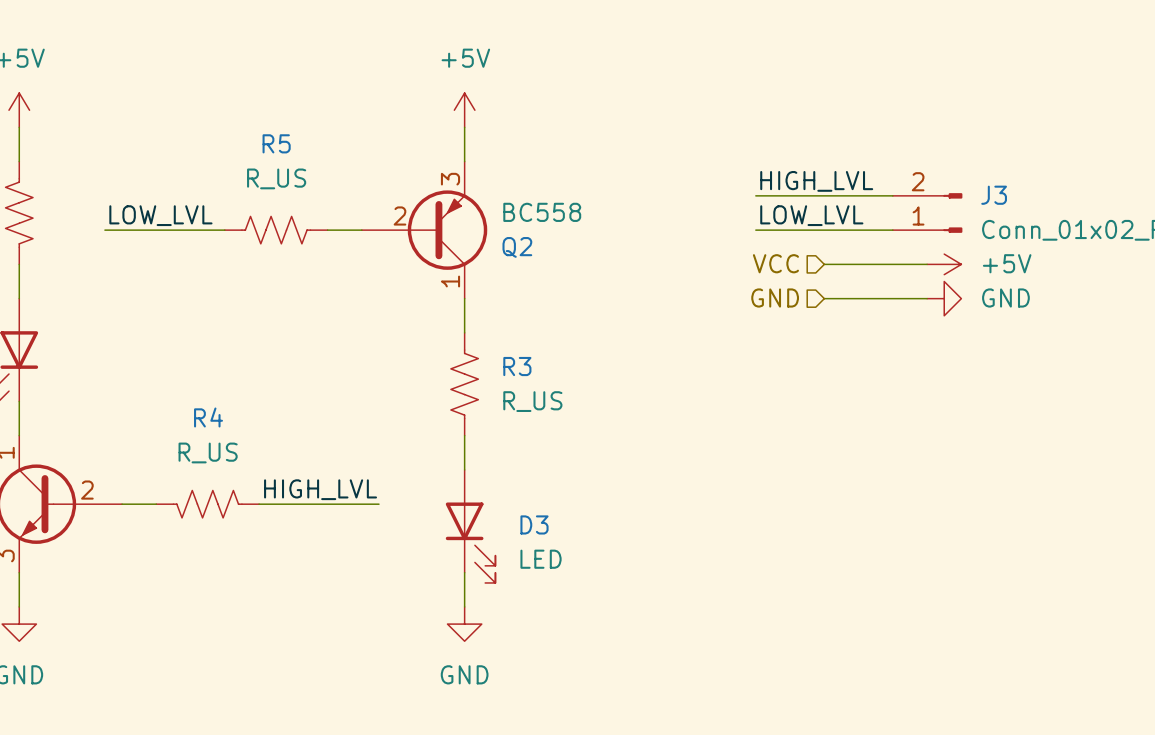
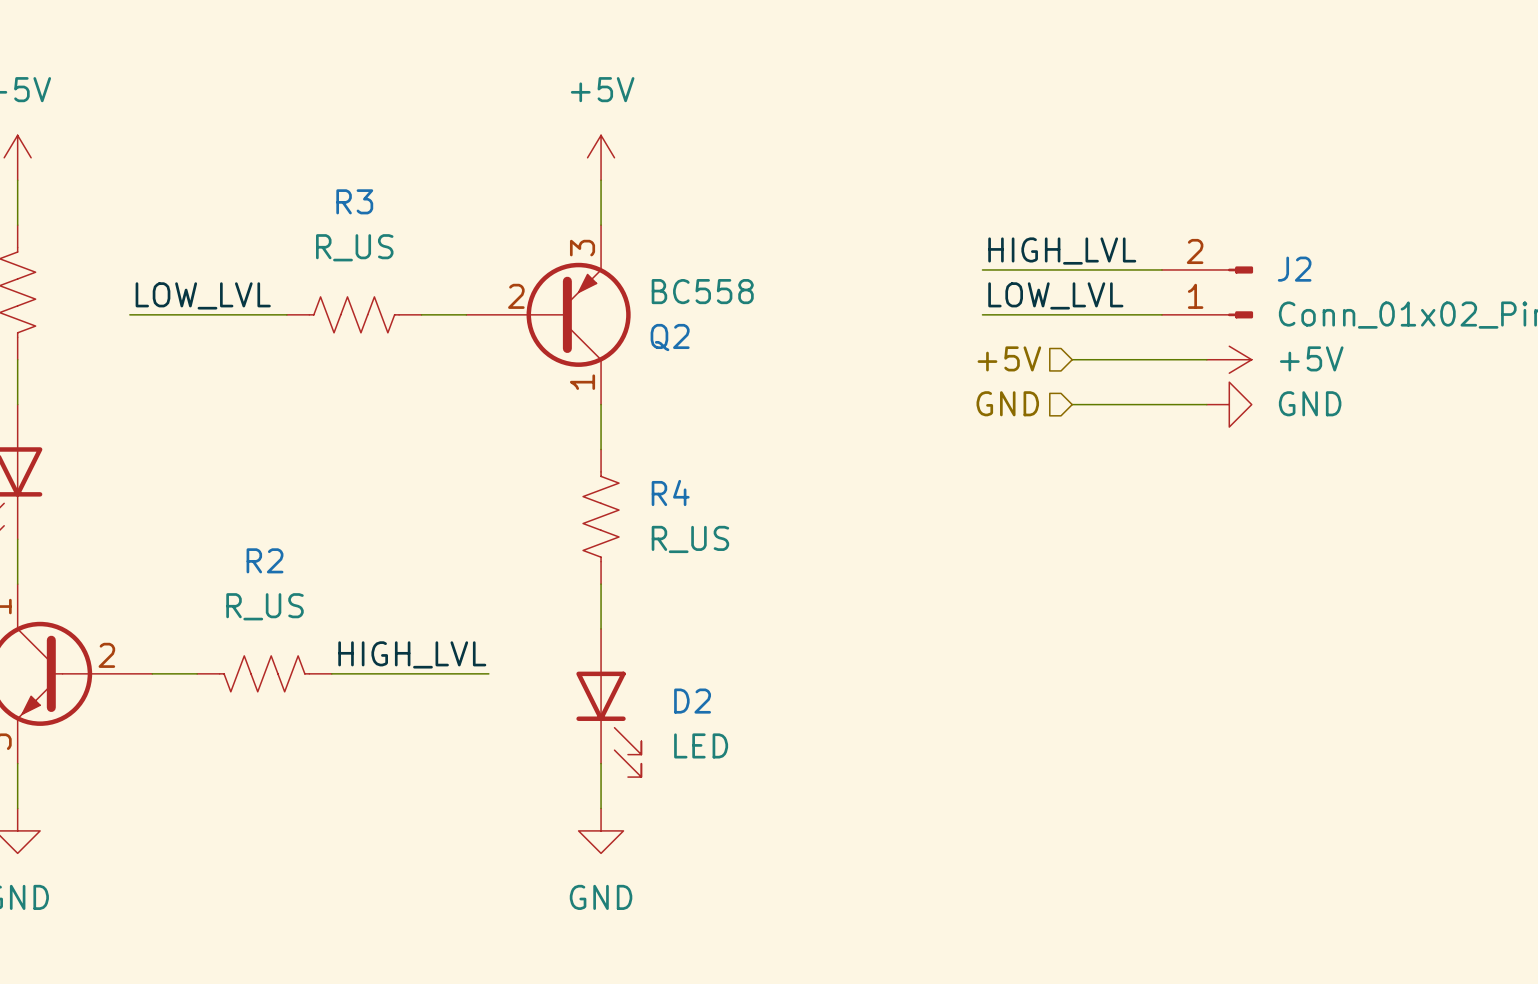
R5 name: R5 (276, 143) -> R3 (354, 201)
J3 name: J3 (994, 195) -> J2 (1294, 269)
hierarchical label: VCC (775, 263) -> +5V (1009, 358)
R3 name: R3 (517, 366) -> R4 (670, 492)
R4 name: R4 (208, 417) -> R2 (265, 560)
D3 name: D3 (534, 524) -> D2 (692, 701)

